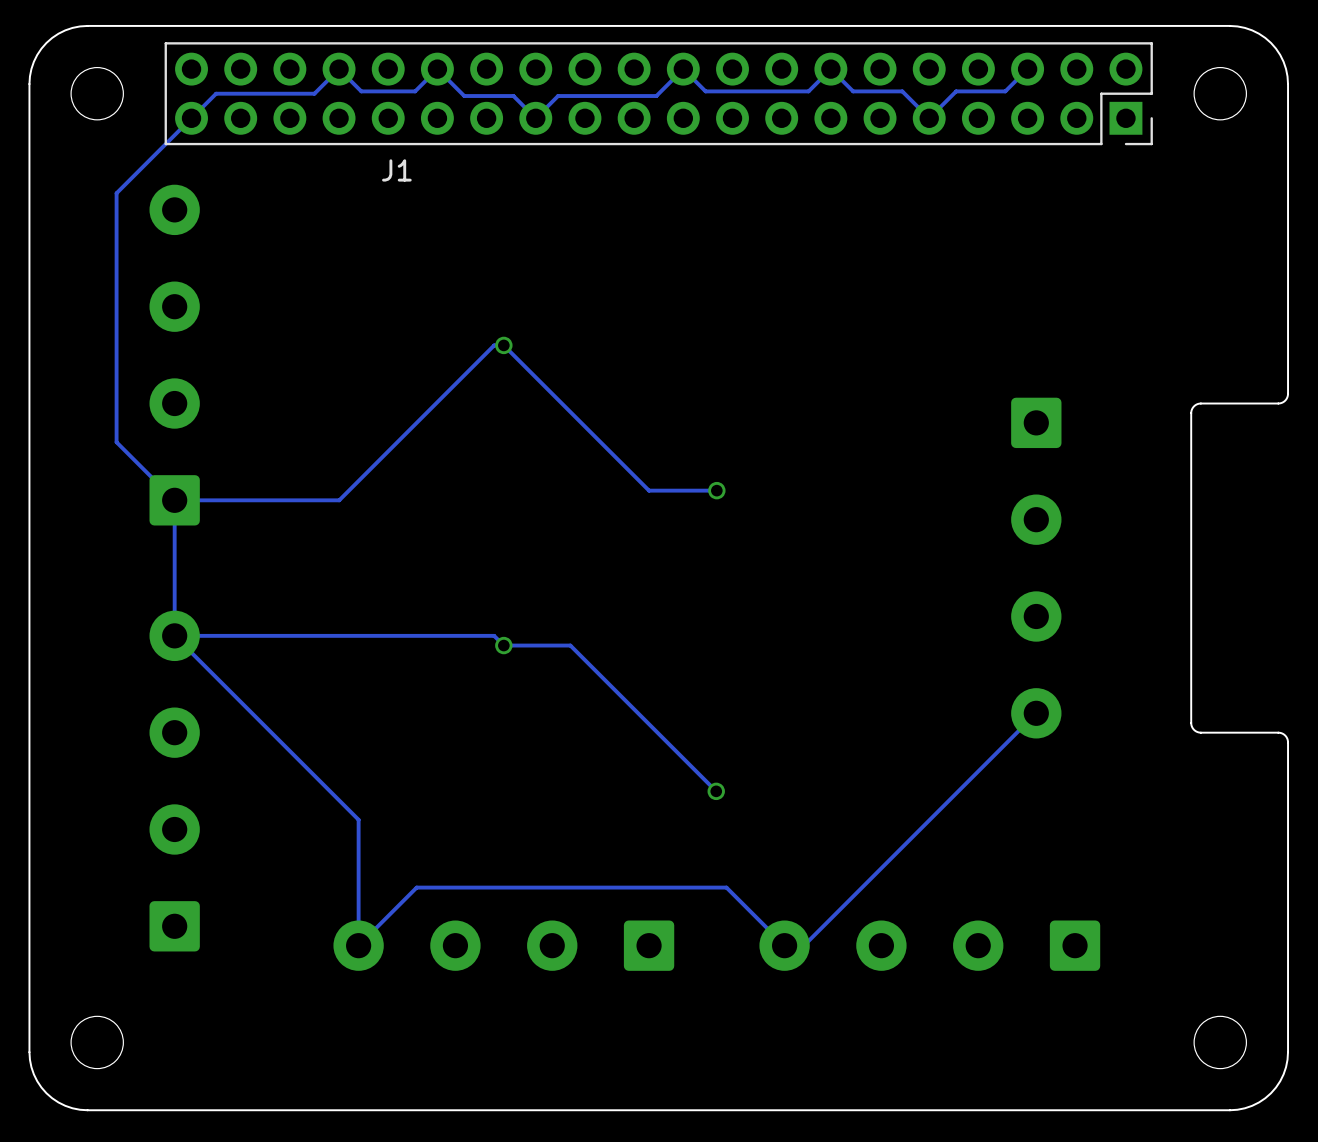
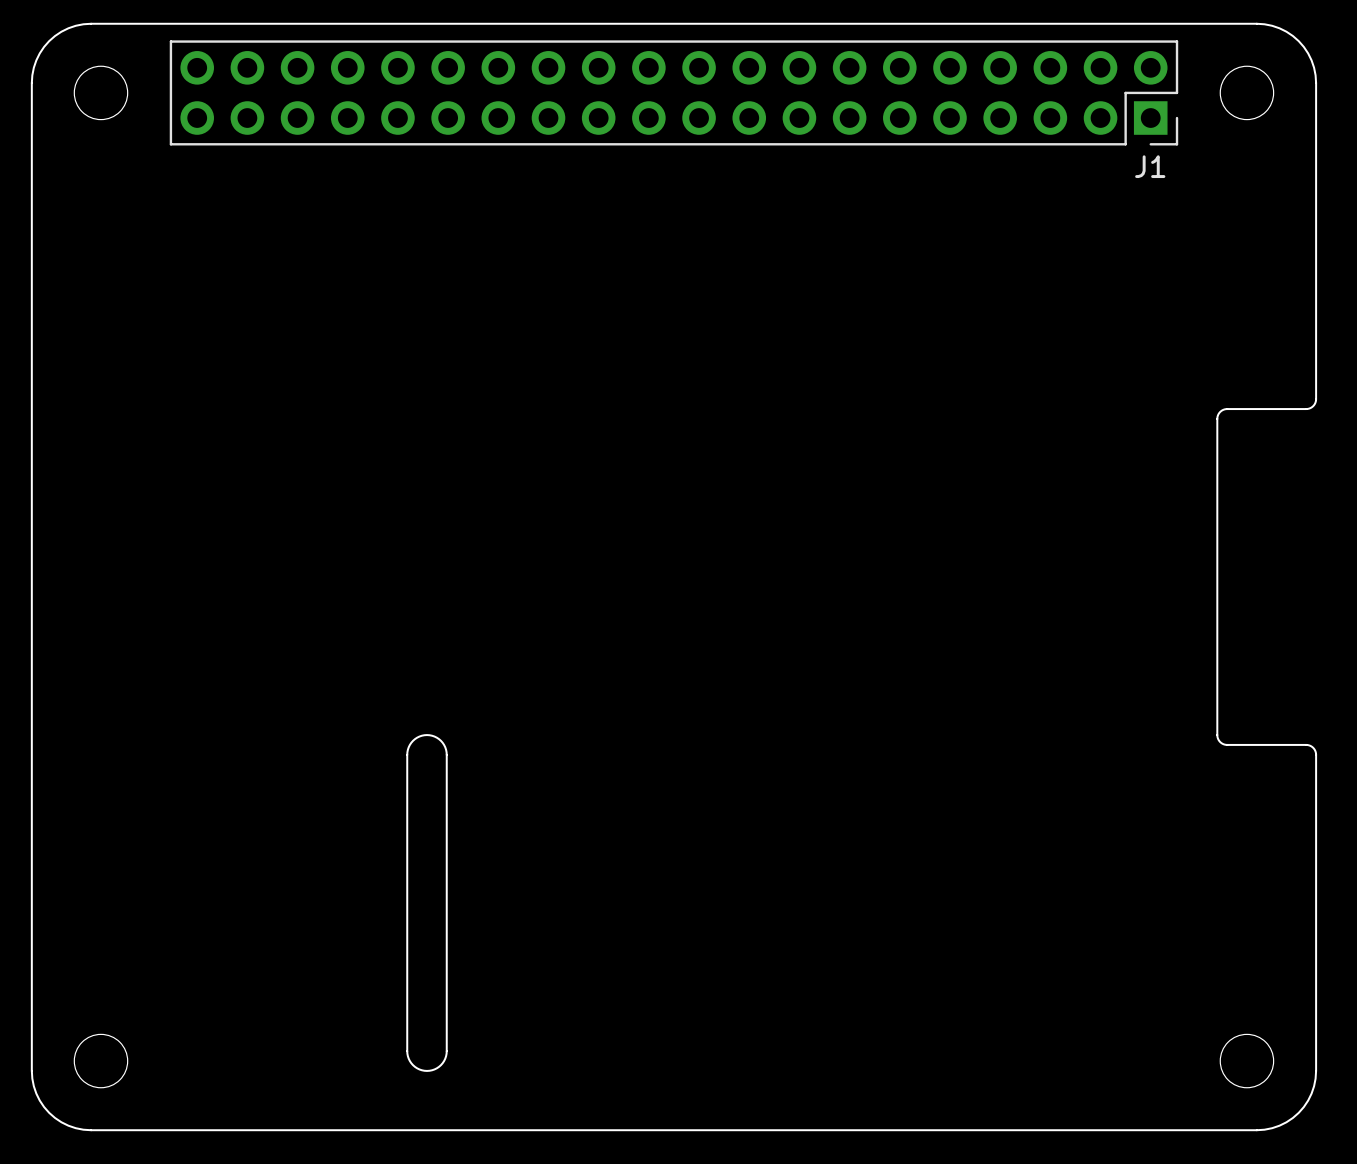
track: (1027, 69) (1005, 91) (956, 91) (929, 118) (902, 91) (853, 91) (830, 69) (808, 91) (705, 91) (683, 69) (656, 96) (558, 96) (535, 118) -> none
track: (535, 118) (513, 96) (464, 96) (437, 69) (415, 91) (361, 91) (339, 69) (314, 93) (216, 93) (116, 193) (116, 442) (174, 500) -> none
J1 name position: J1 (396, 170) -> J1 (1150, 166)
via: (503, 345) -> none
part: (174, 355) -> none
via: (716, 490) -> none
track: (716, 491) (649, 490) (503, 345) (494, 345) (339, 500) (174, 500) -> none
track: (174, 500) (174, 635) -> none
part: (1036, 568) -> none
track: (174, 635) (358, 819) (358, 945) (416, 887) (726, 887) (784, 945) (803, 945) (1036, 713) -> none
track: (174, 635) (494, 635) (503, 645) (570, 645) (716, 791) -> none
via: (503, 645) -> none
board edge: none -> (446, 754) (446, 1053) (444, 1061) (439, 1066) (432, 1070) (424, 1070) (417, 1068) (411, 1063) (407, 1051) (407, 752) (413, 740) (419, 736) (426, 735) (434, 736) (440, 740) (445, 747) (446, 754)
part: (174, 781) -> none
via: (716, 791) -> none
part: (503, 945) -> none
part: (929, 945) -> none

